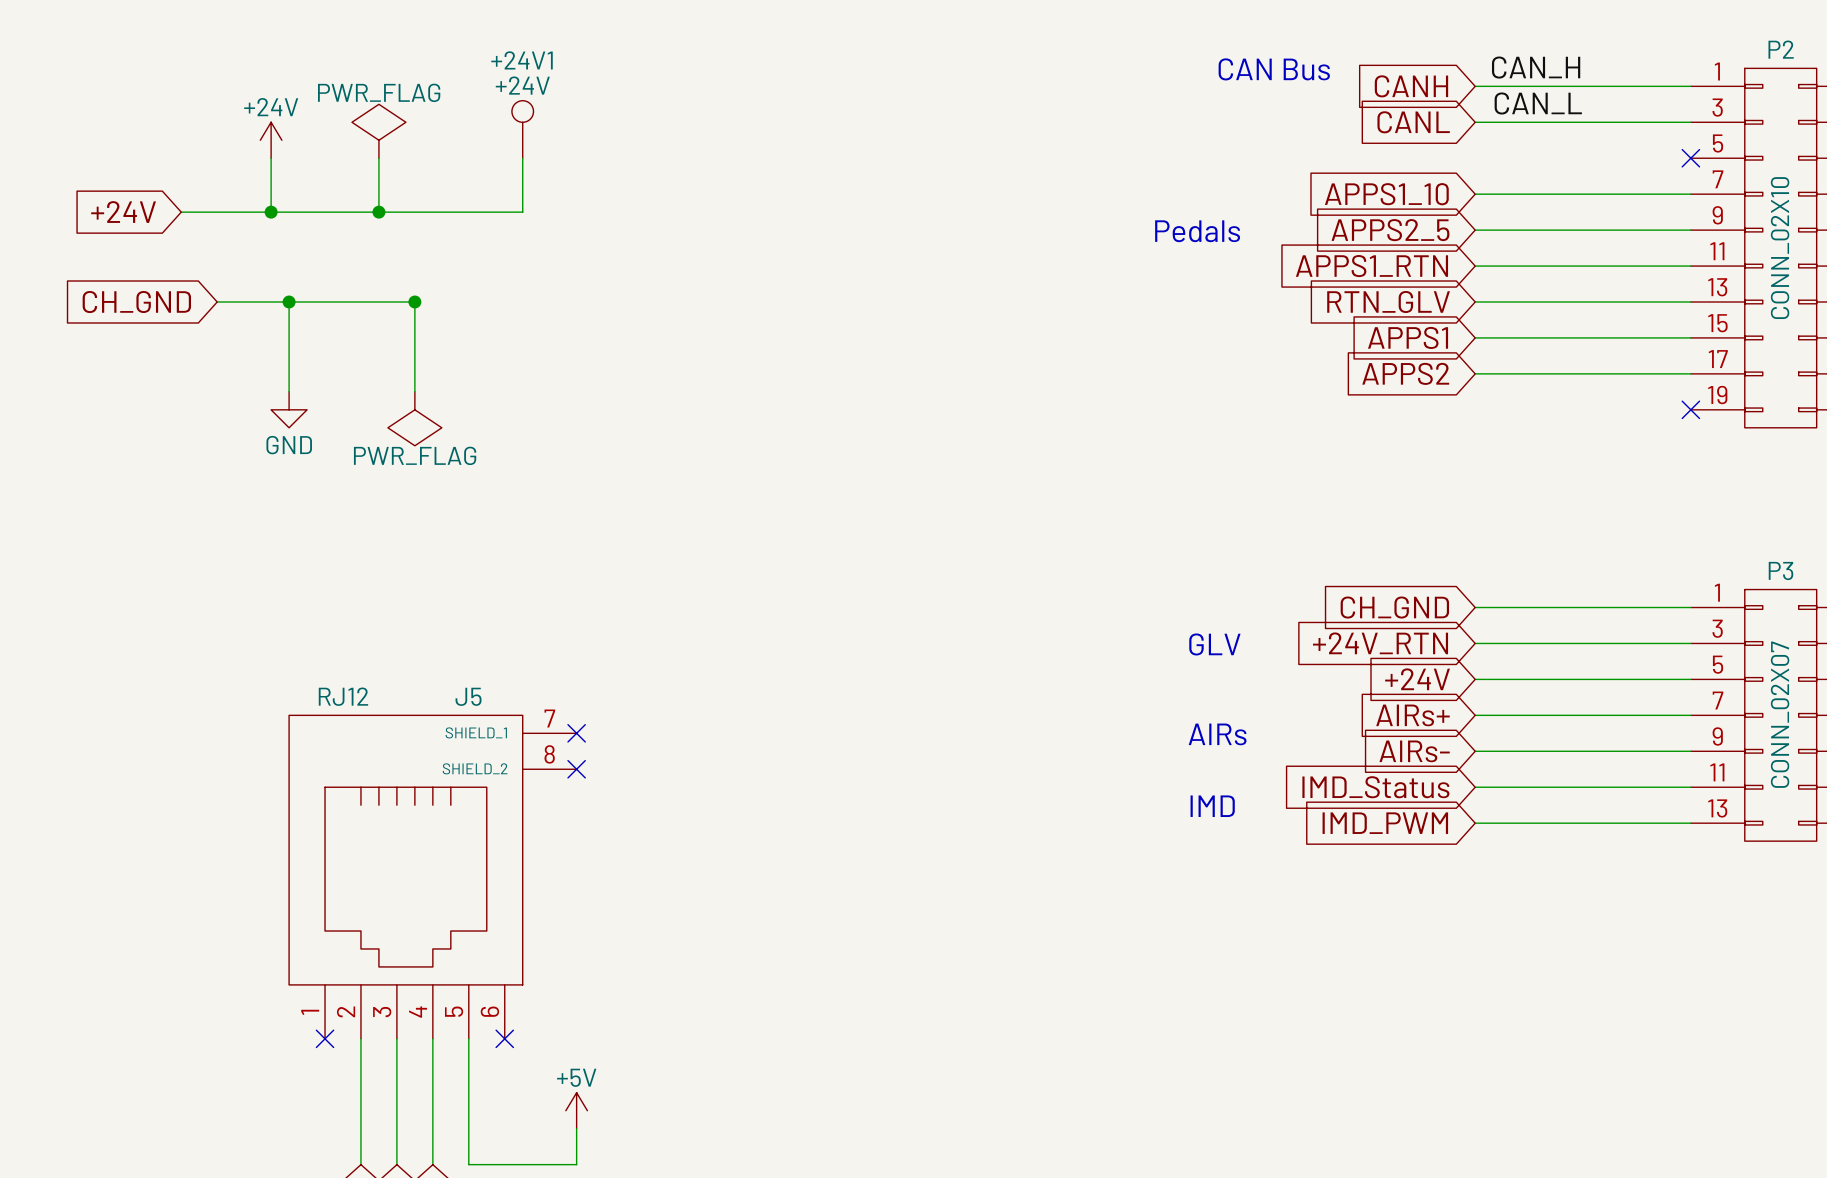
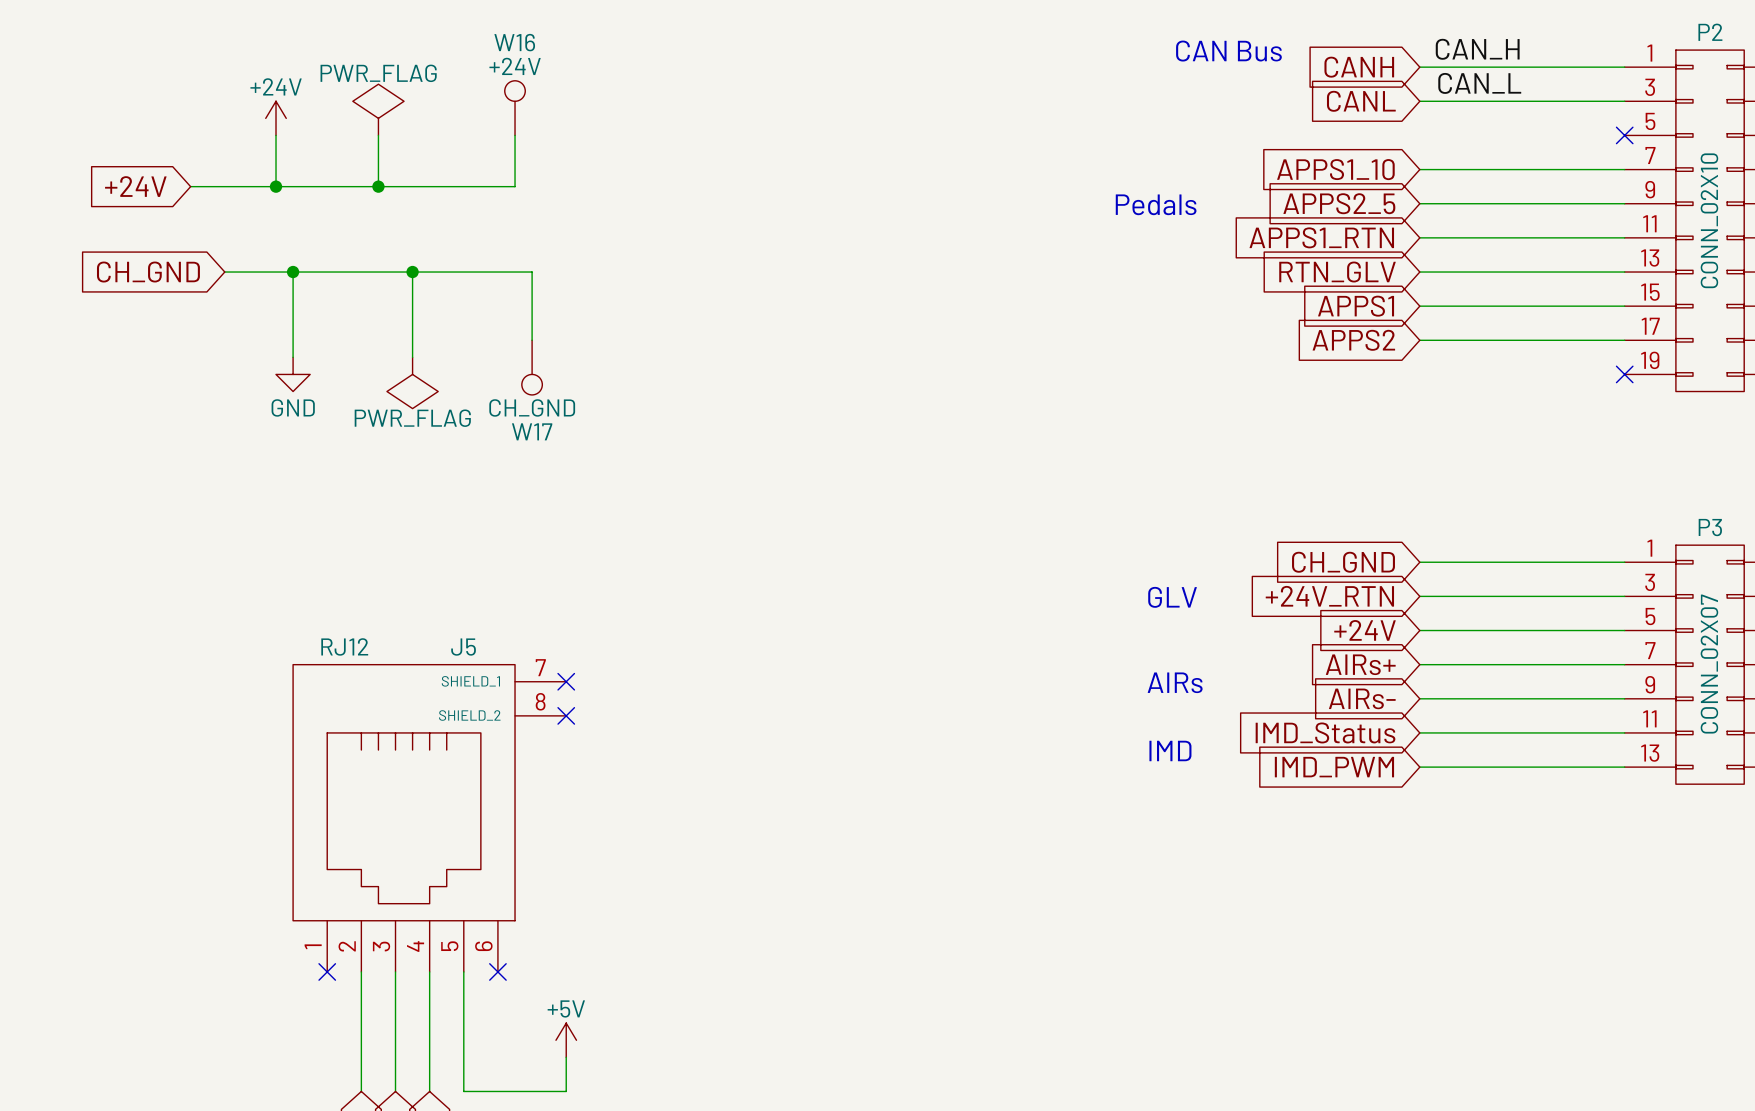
+24V1 name: +24V1 (522, 60) -> W16 (514, 42)
wire: none -> (412, 272) (532, 272) (532, 340)
W17: none -> CH_GND (532, 367)

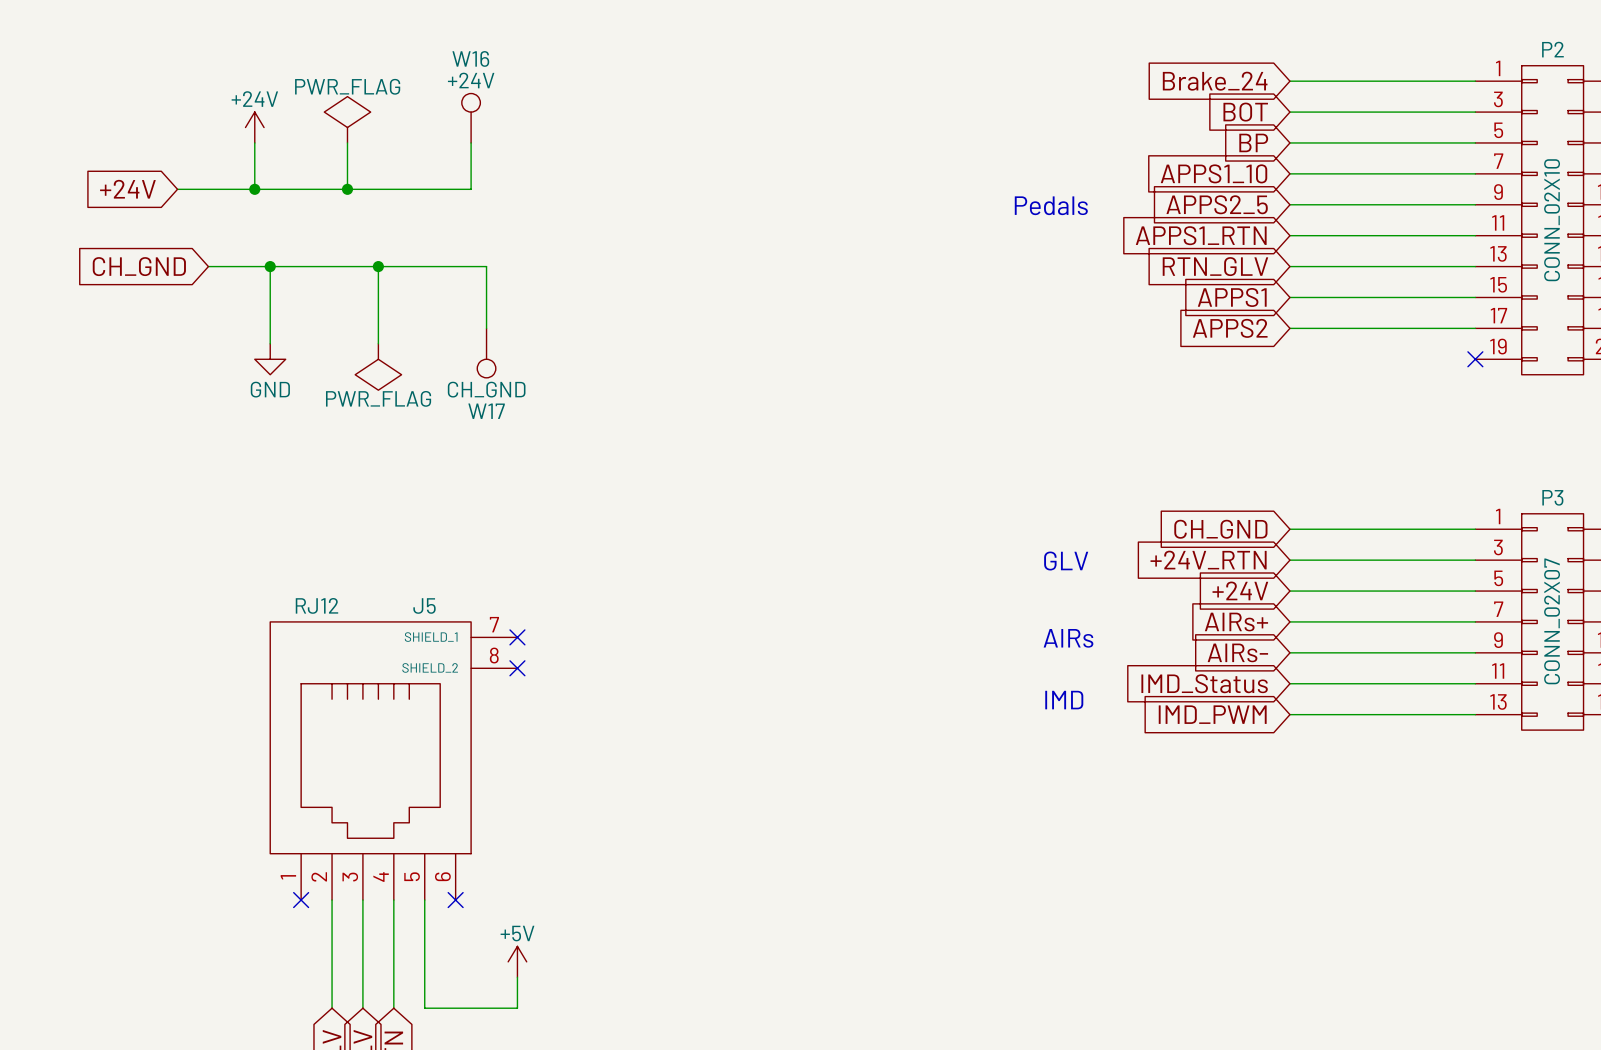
label: CAN_H (1477, 49) -> none
text: CAN Bus (1228, 51) -> none
global label: CANH (1359, 67) -> Brake_24 (1215, 81)
label: CAN_L (1479, 83) -> none
global label: CANL (1361, 101) -> BOT (1245, 112)
global label: none -> BP (1253, 142)
wire: none -> (1289, 142) (1475, 142)
no-connect mark: (1624, 135) -> none

